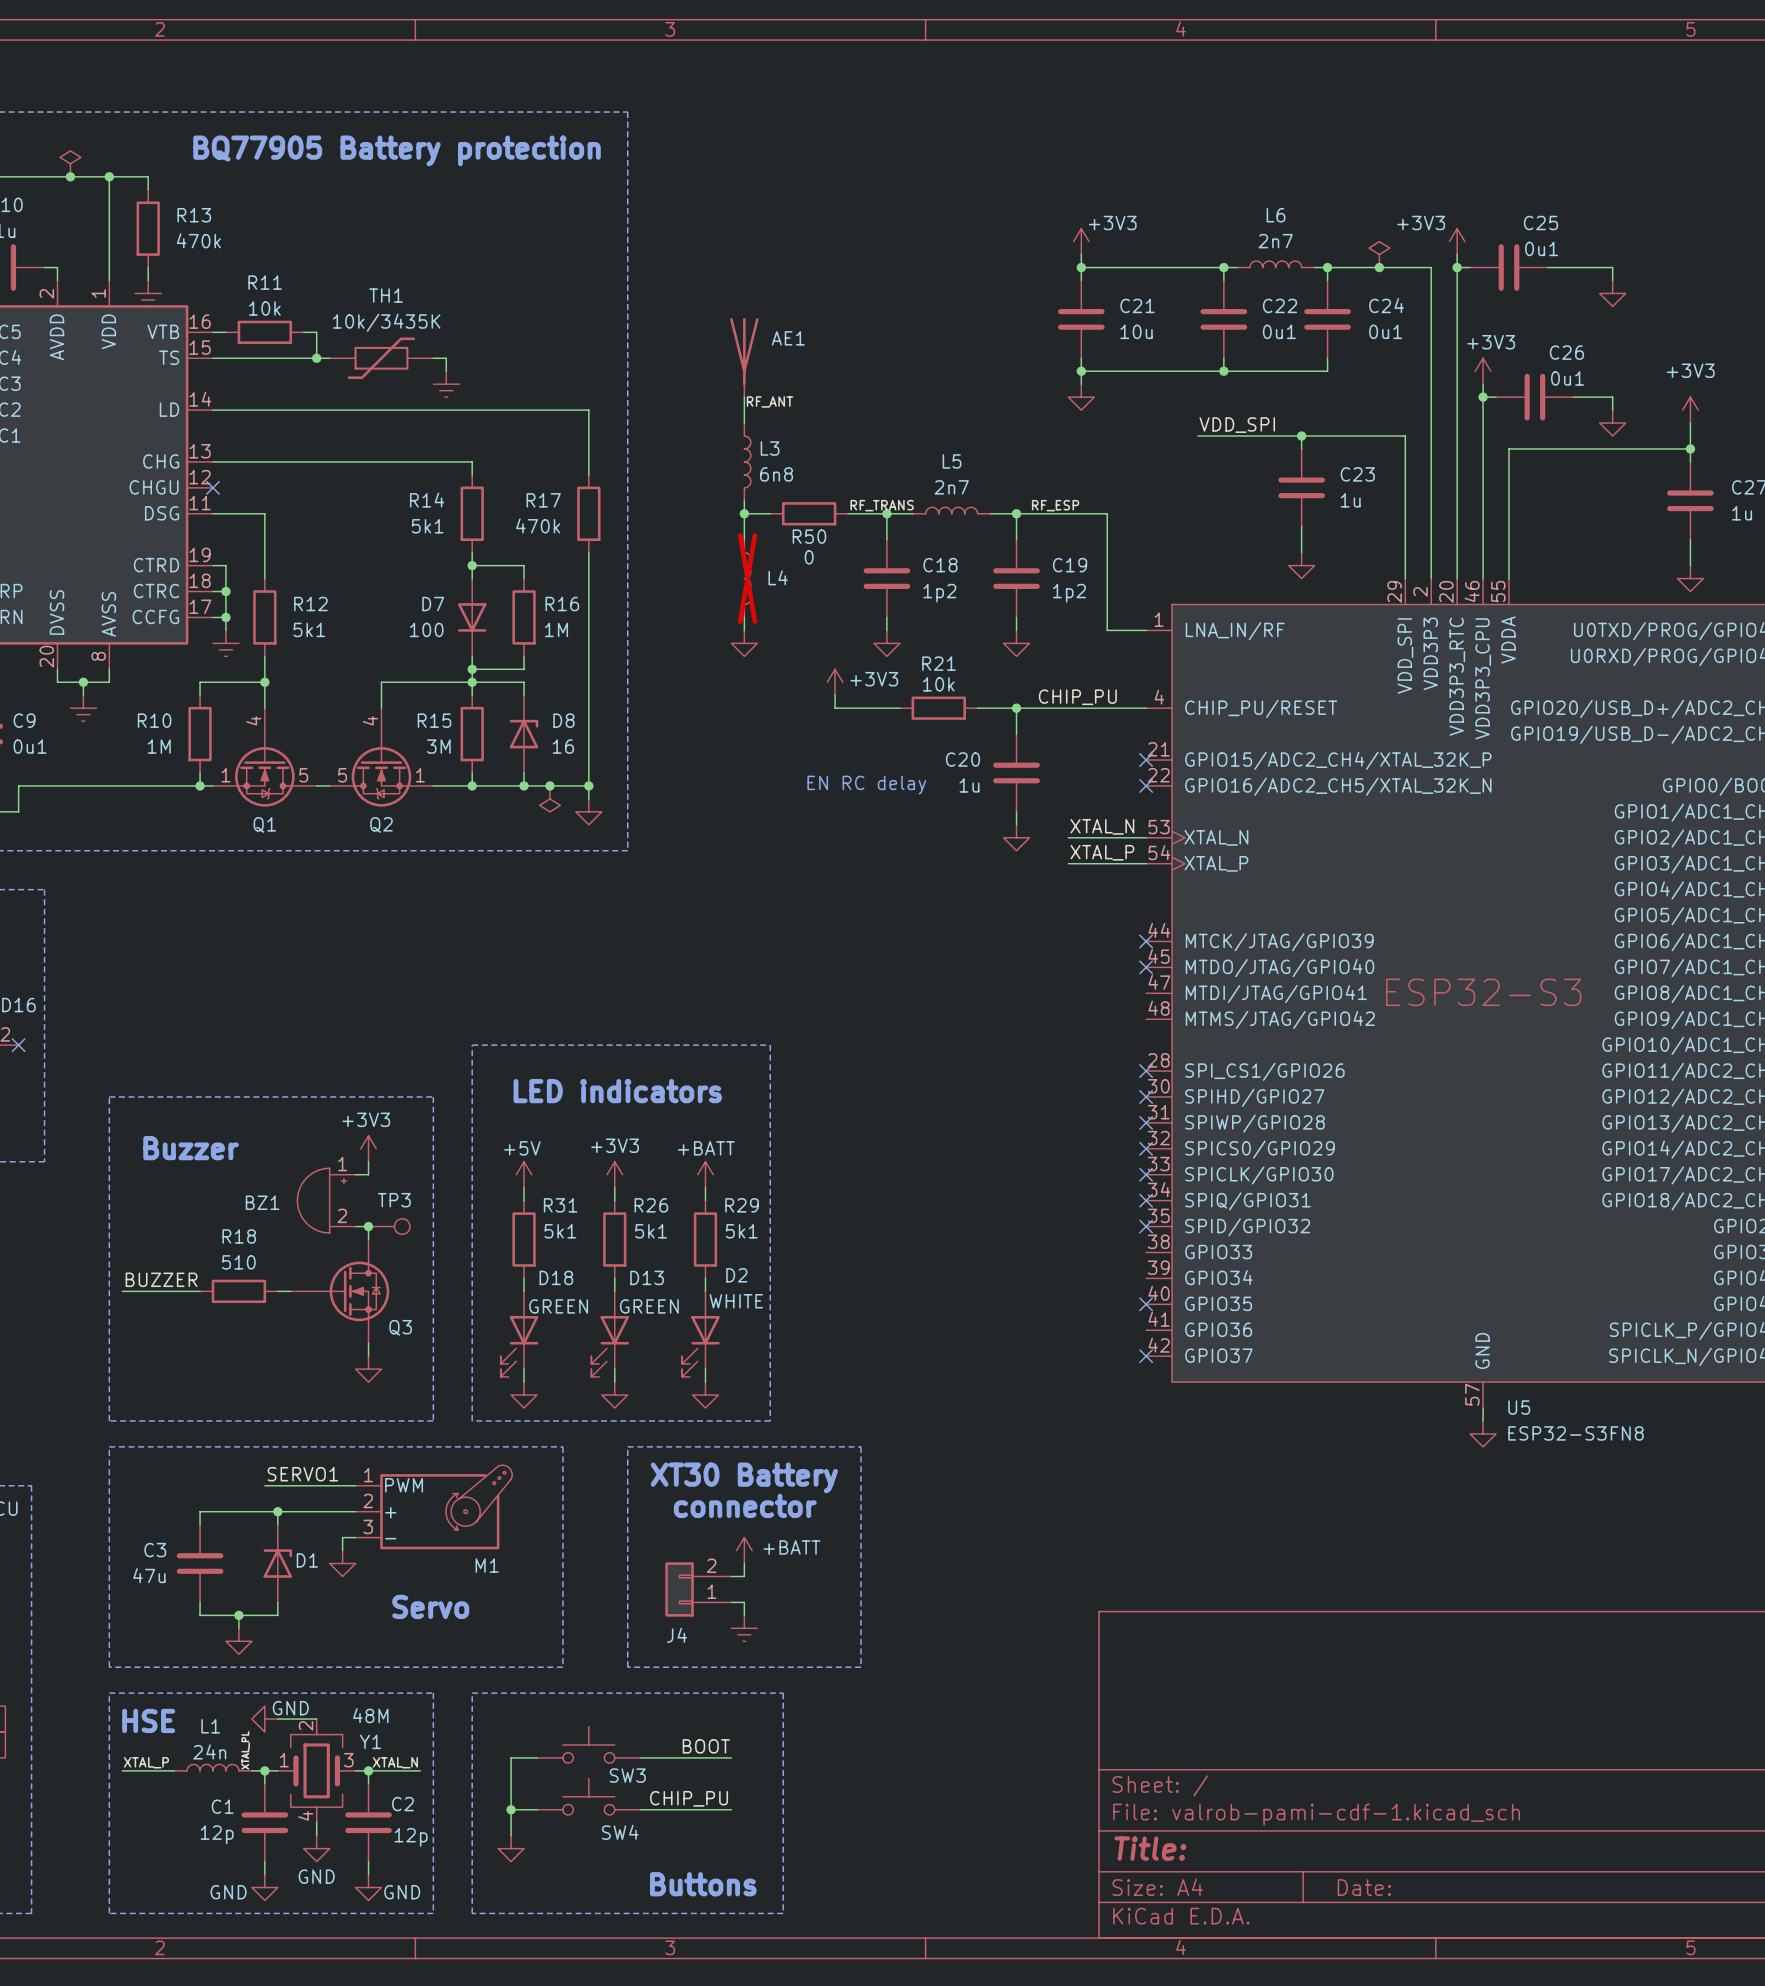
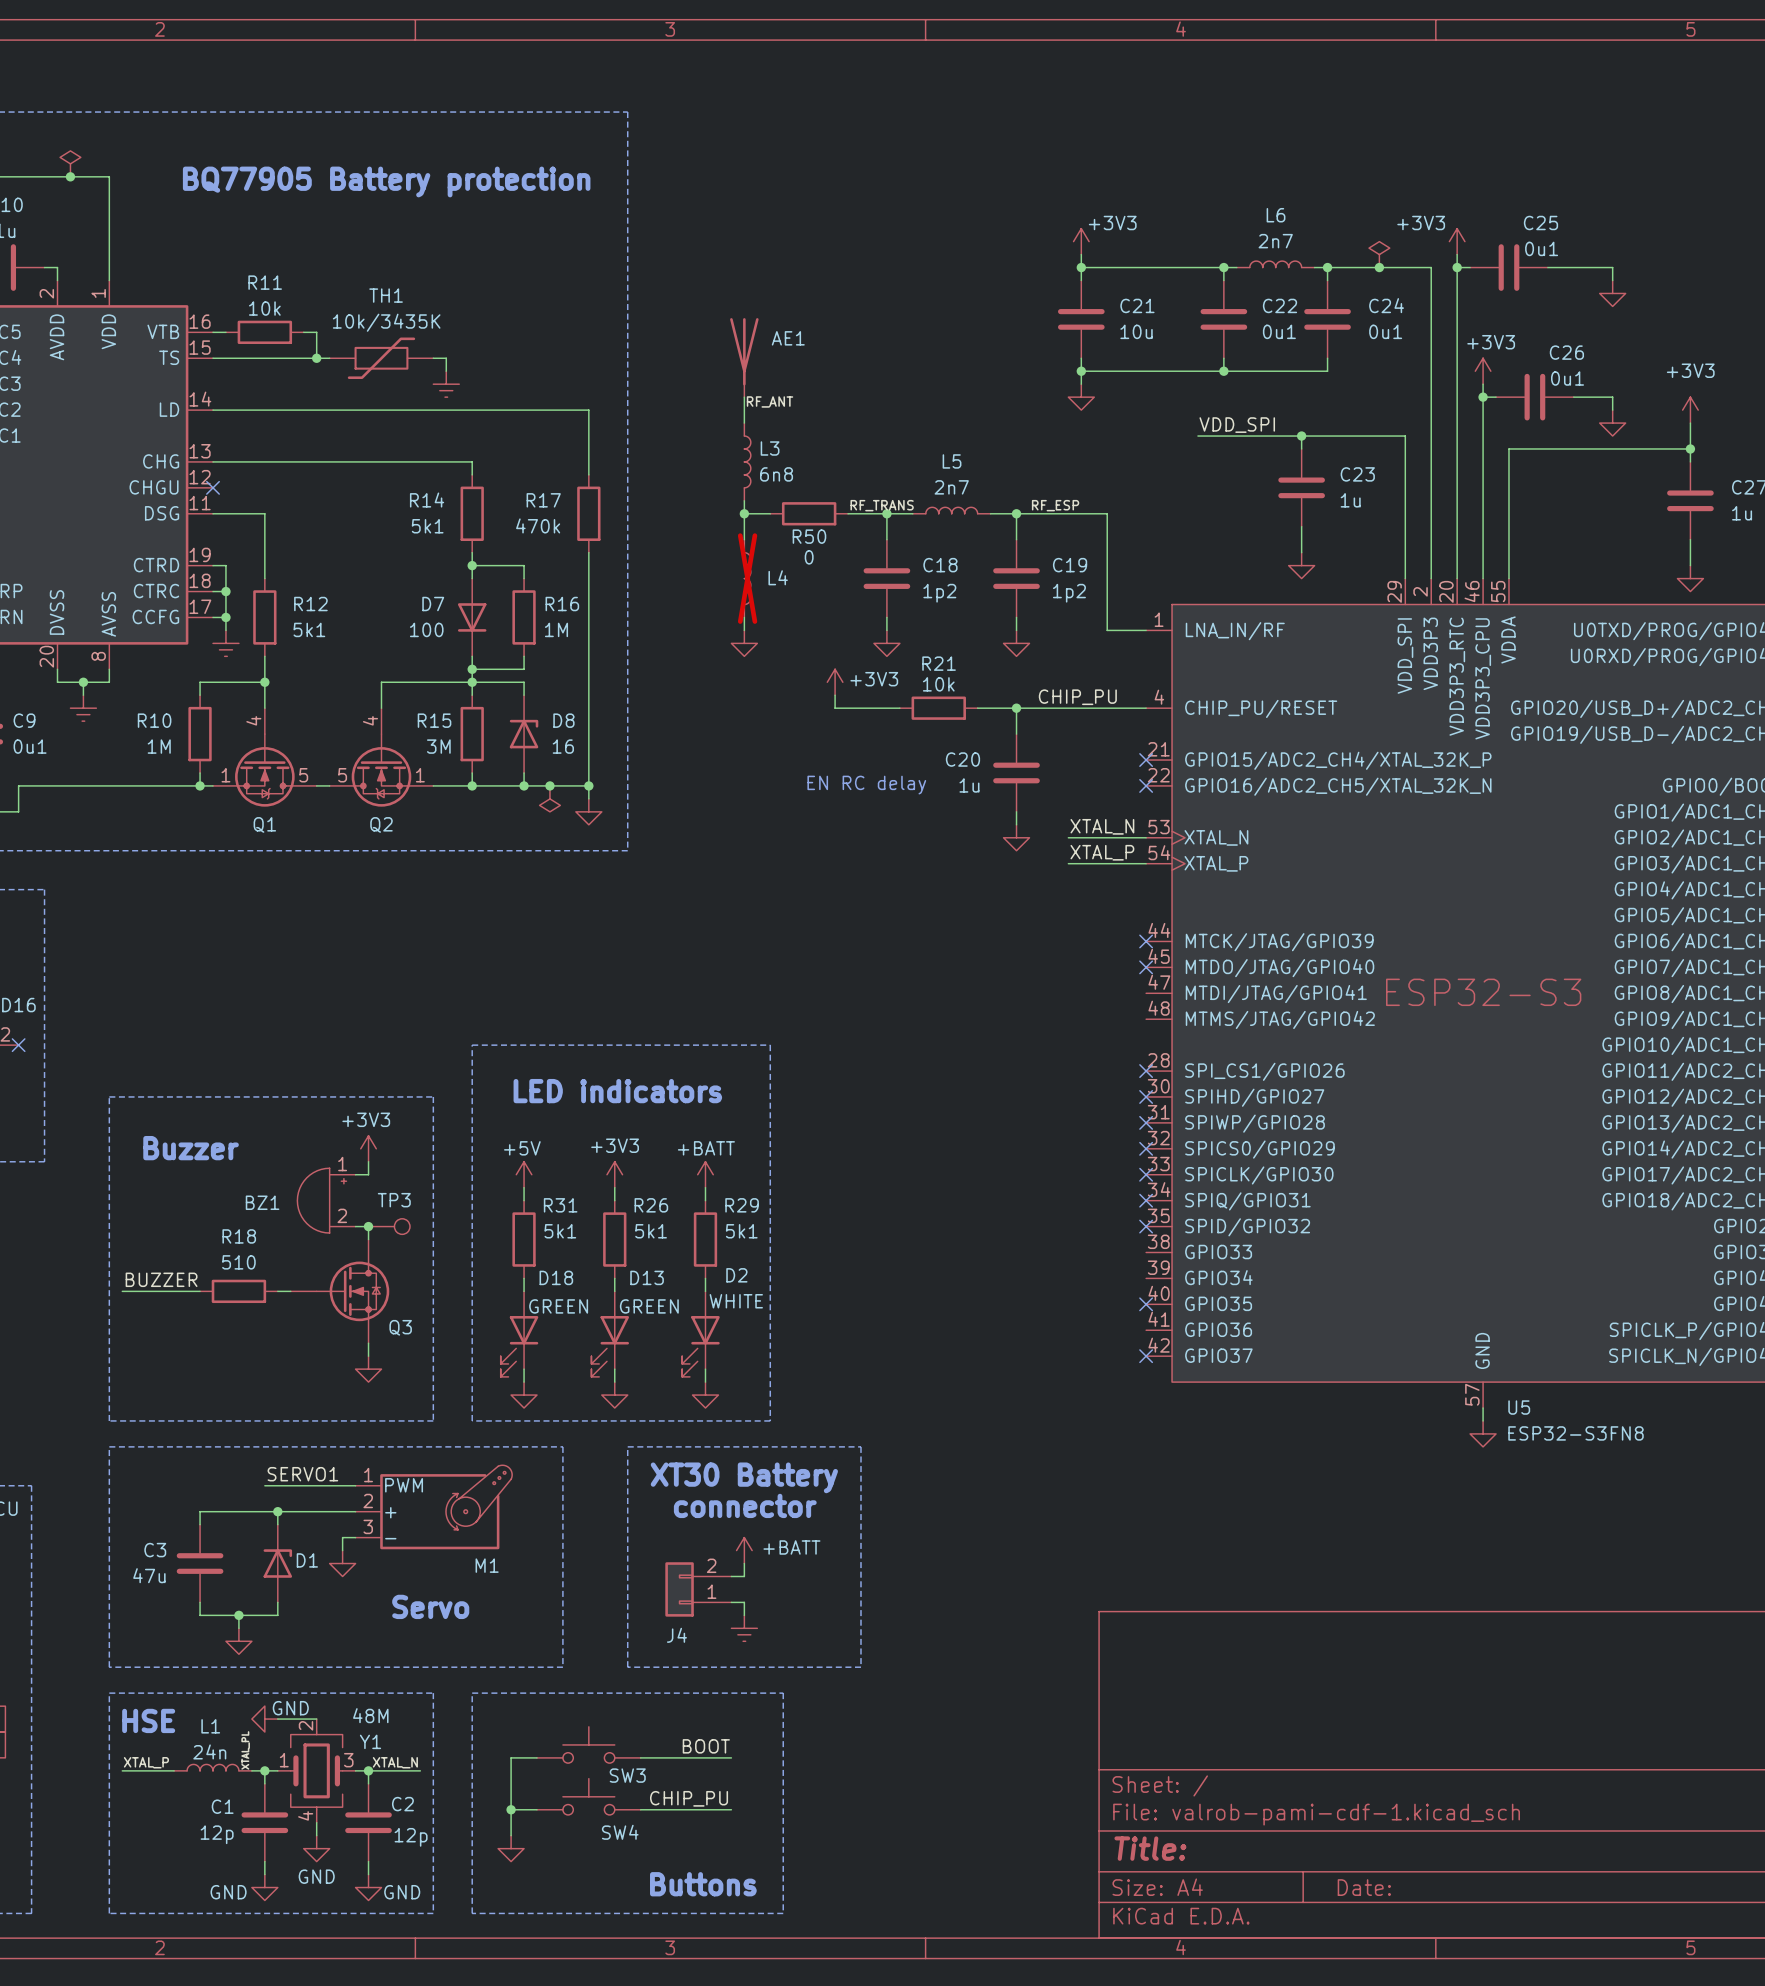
text position: BQ77905 Battery protection (397, 150) -> BQ77905 Battery protection (386, 181)
wire: (109, 176) (148, 176) (148, 189) -> none
junction: (109, 176) -> none
R13: 470k (148, 228) -> none
wire: (148, 267) (148, 280) -> none
power symbol: (148, 293) -> none

